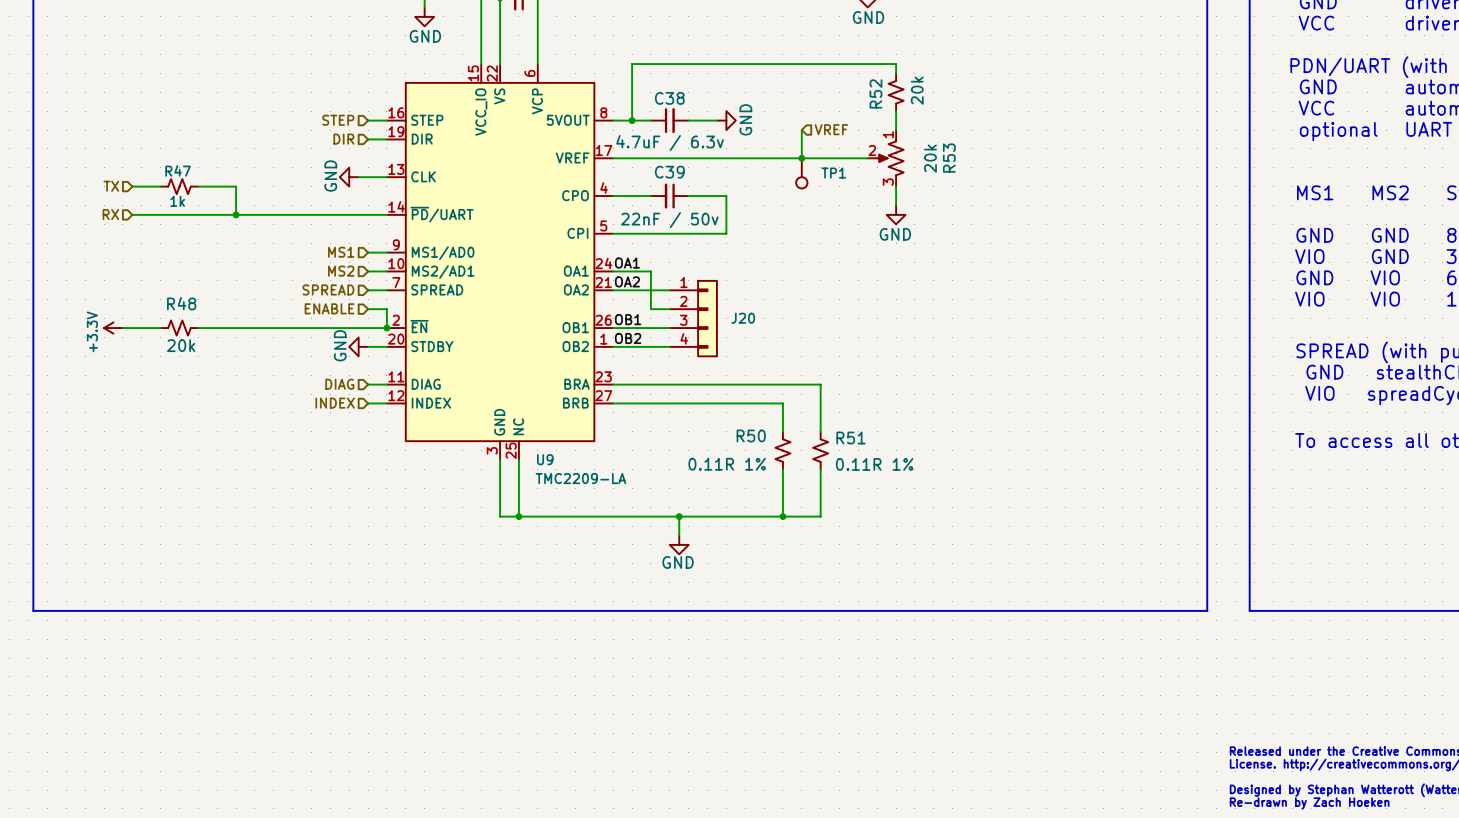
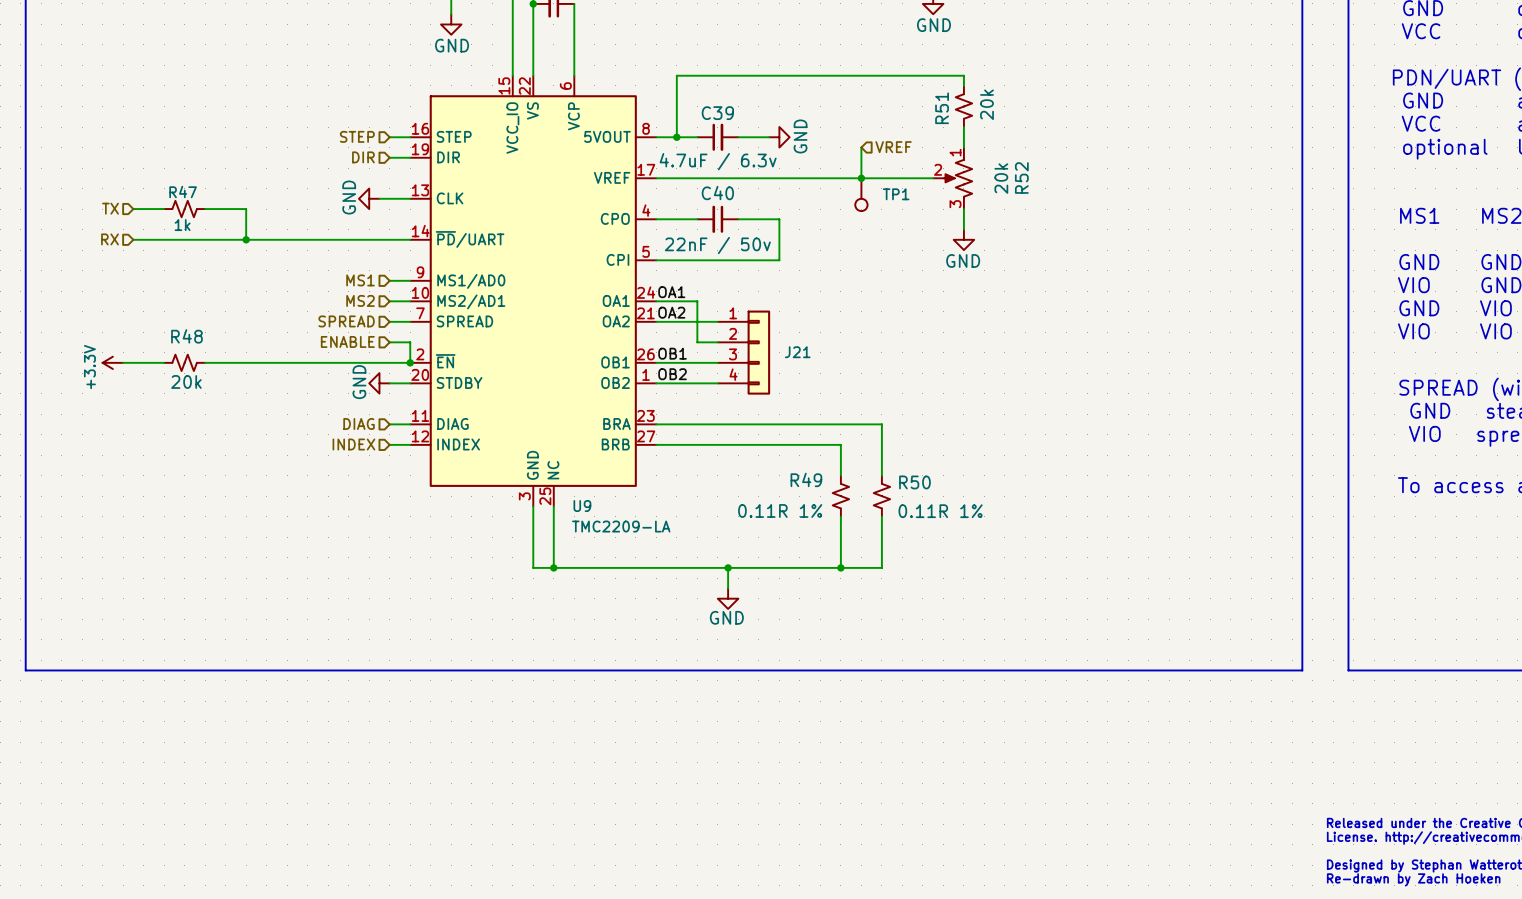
R52 name: R52 (875, 93) -> R51 (942, 108)
C38 name: C38 (669, 98) -> C39 (717, 113)
R53 name: R53 (949, 158) -> R52 (1021, 177)
C39 name: C39 (669, 172) -> C40 (717, 193)
J20 name: J20 (743, 318) -> J21 (797, 352)
R50 name: R50 (751, 435) -> R49 (806, 479)
R51 name: R51 (851, 438) -> R50 (914, 482)

